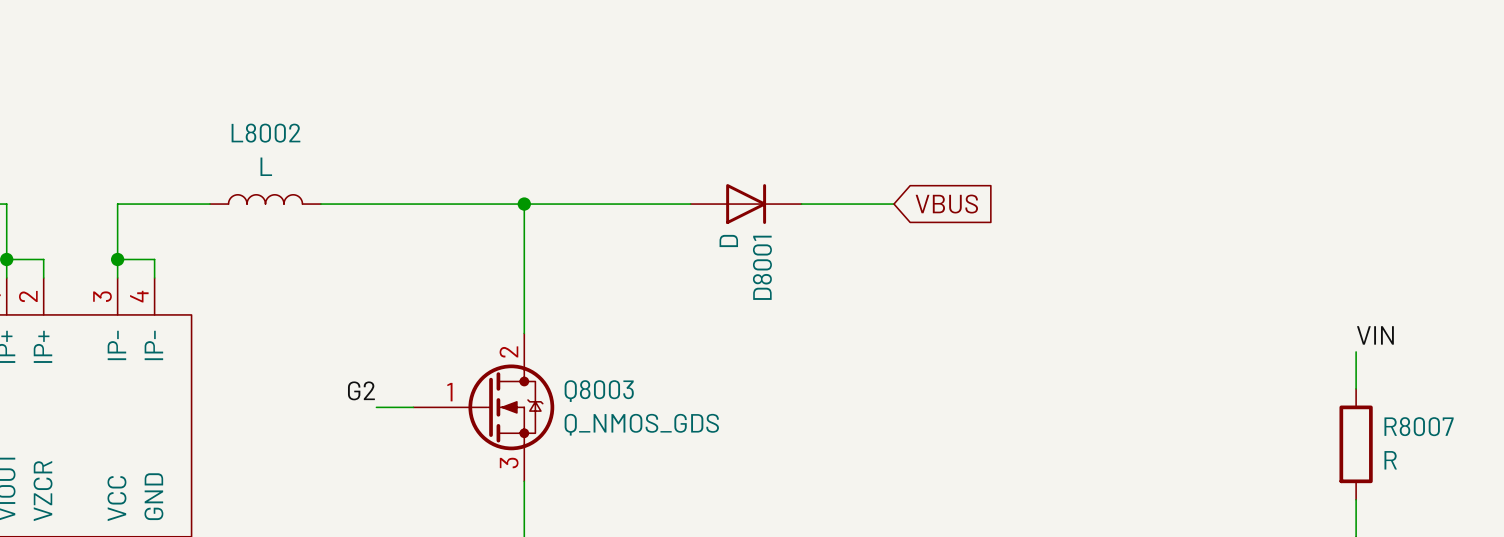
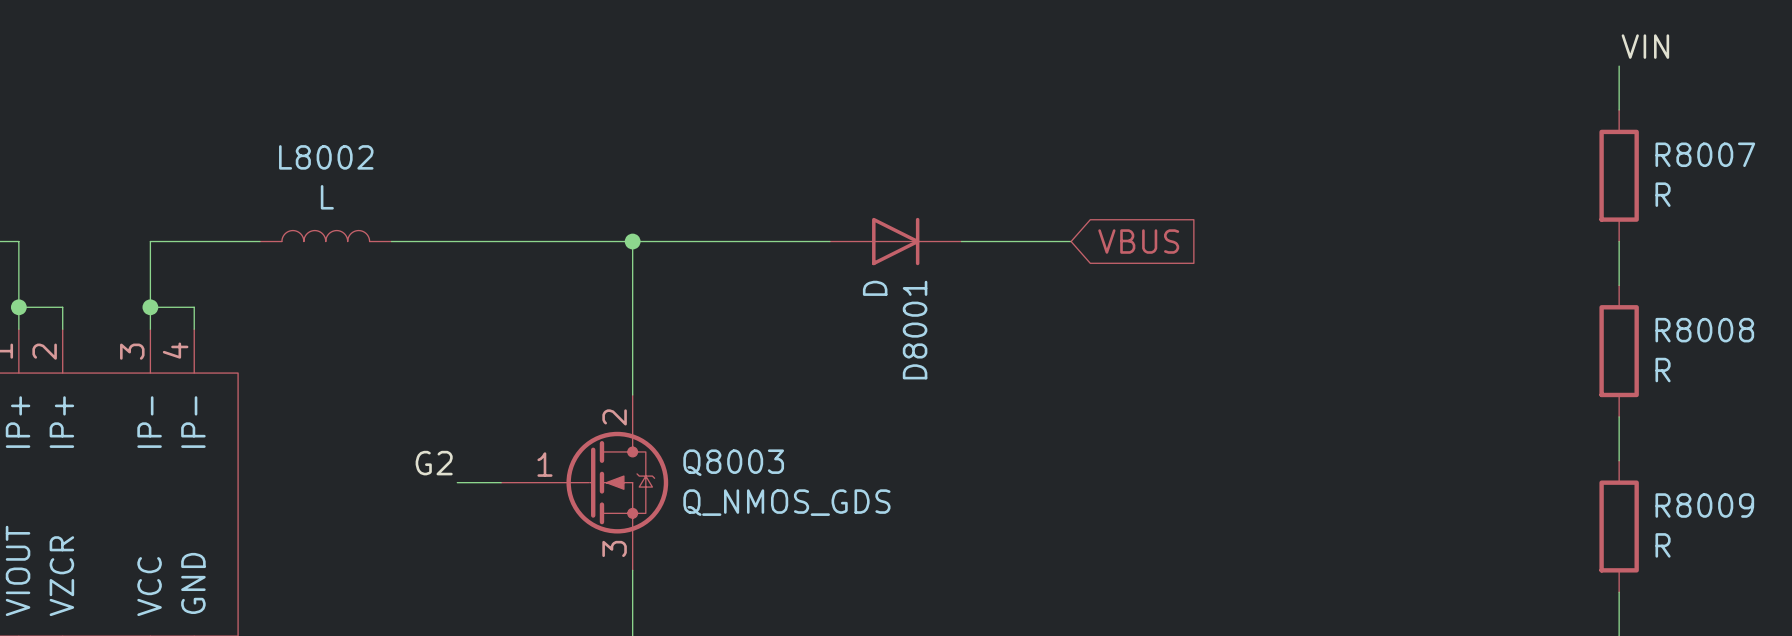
wire: none -> (1619, 66) (1619, 109)
R8007: none -> R (1619, 175)
wire: none -> (1619, 241) (1619, 285)
R8008: none -> R (1619, 351)
label position: VIN (1375, 335) -> VIN (1645, 46)
R8007 name: R8007 (1419, 426) -> R8009 (1704, 505)

